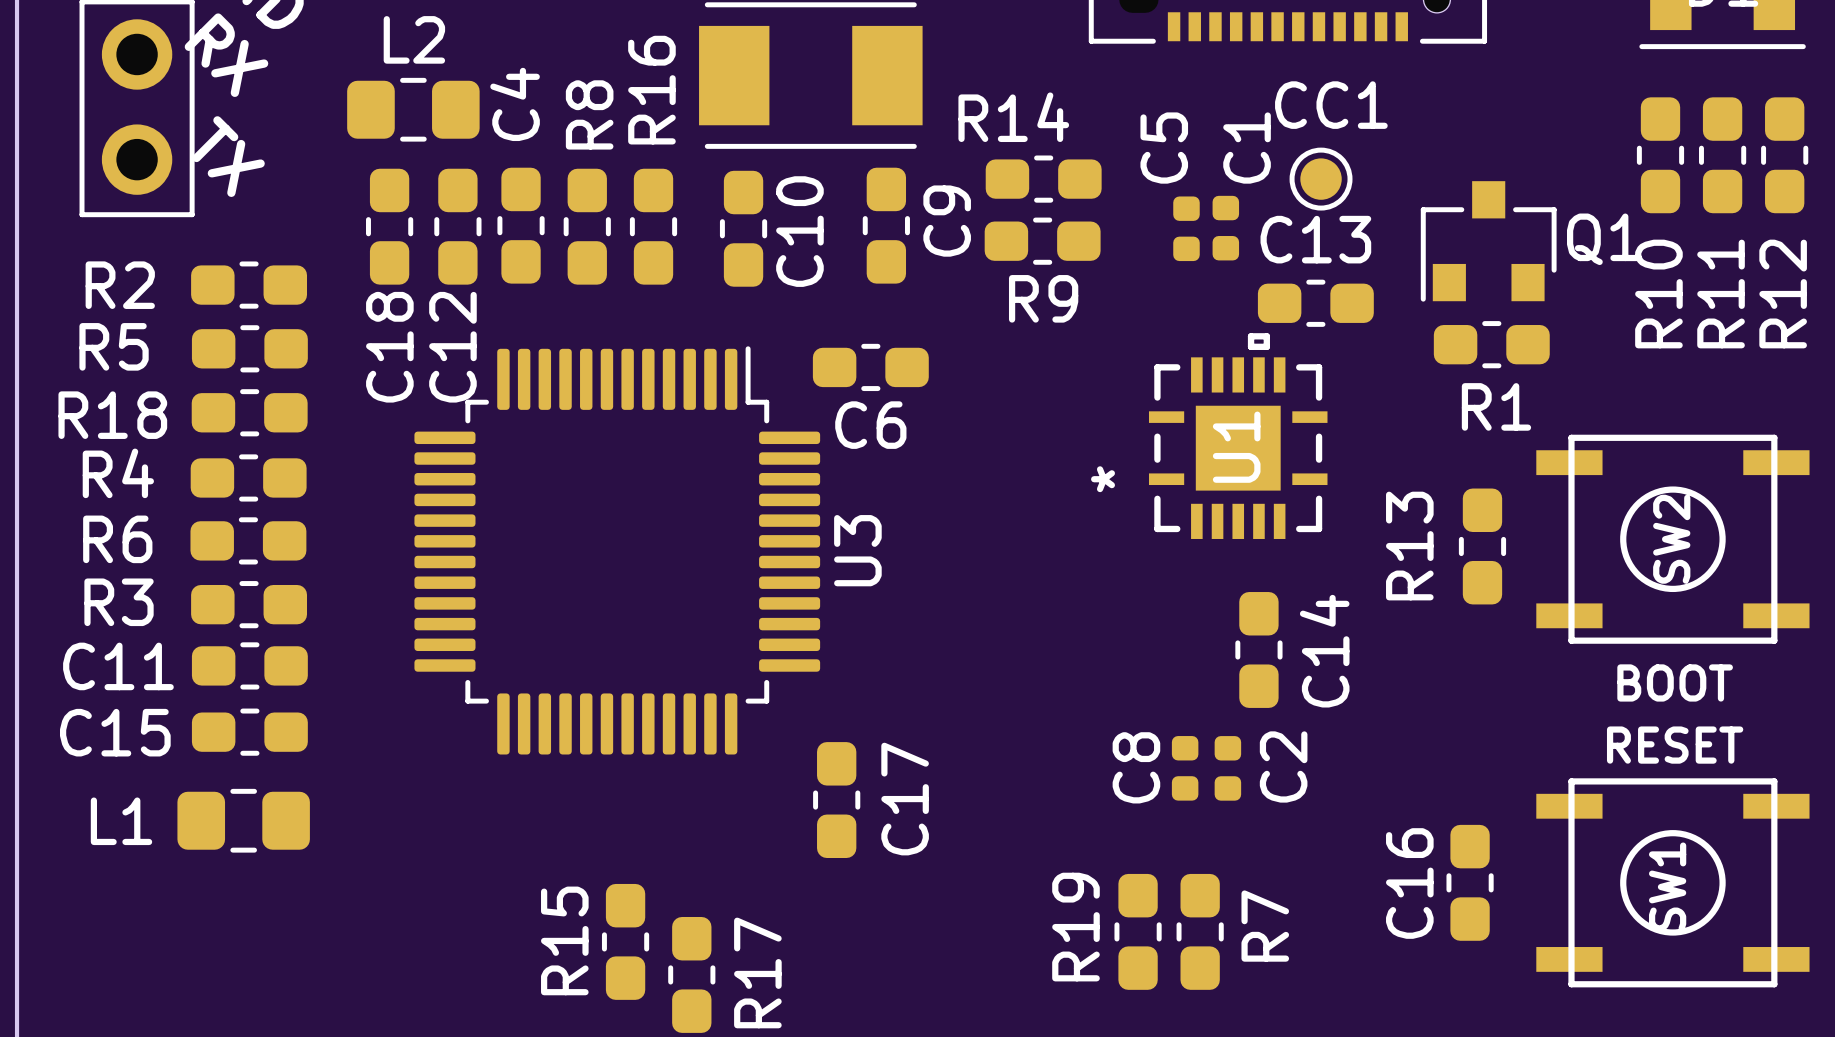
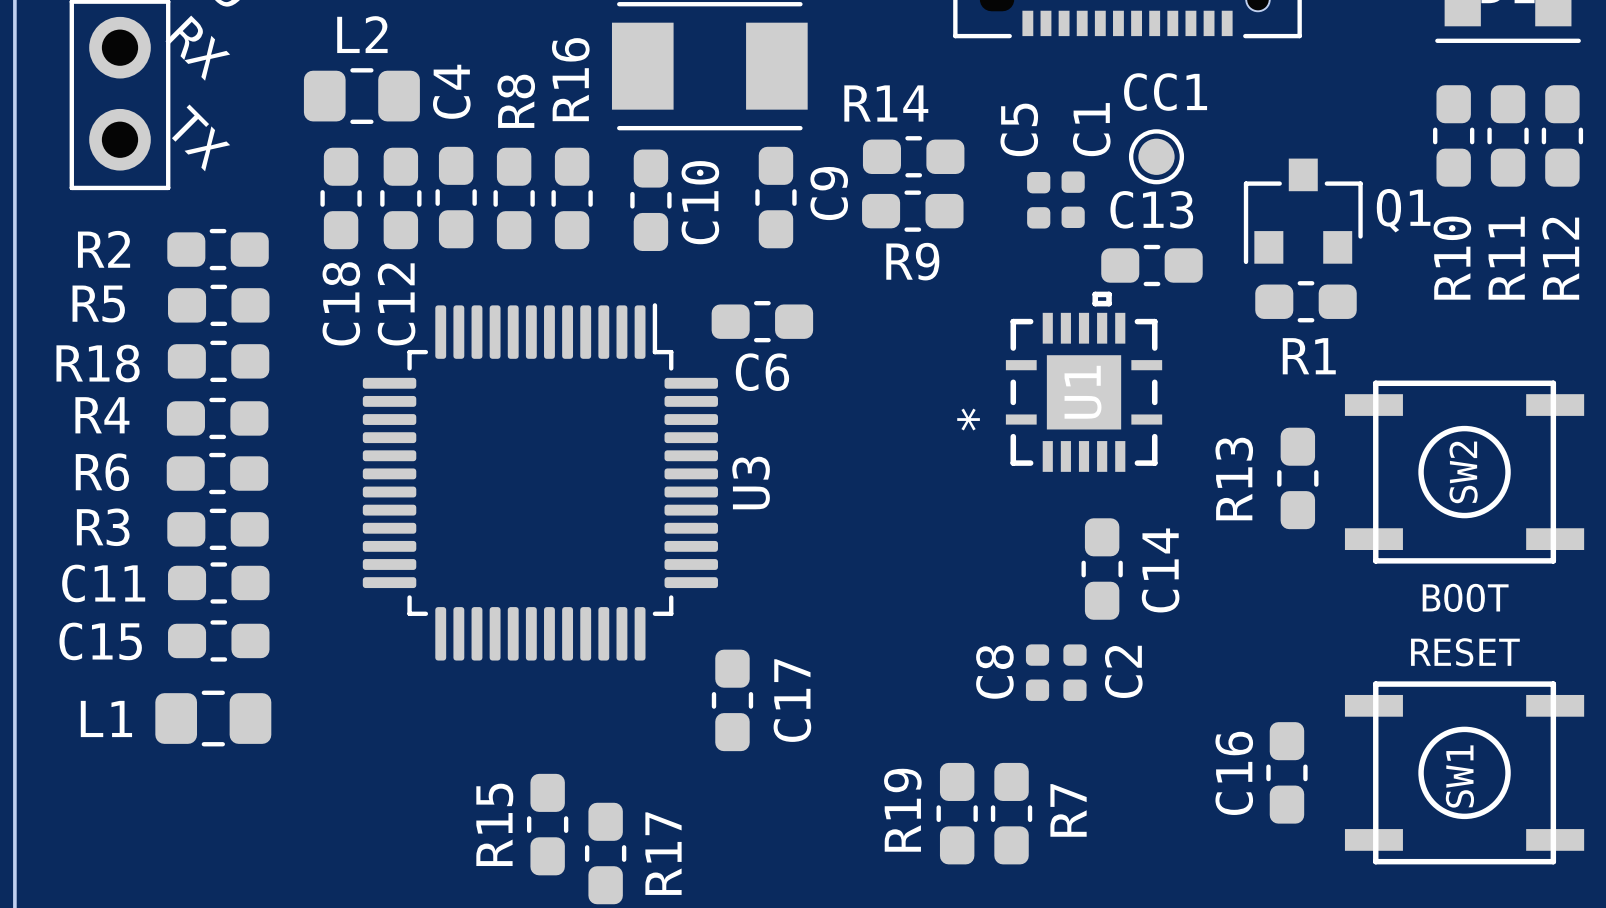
R19 position: (1138, 931) -> (957, 813)
R7 position: (1200, 931) -> (1011, 813)

